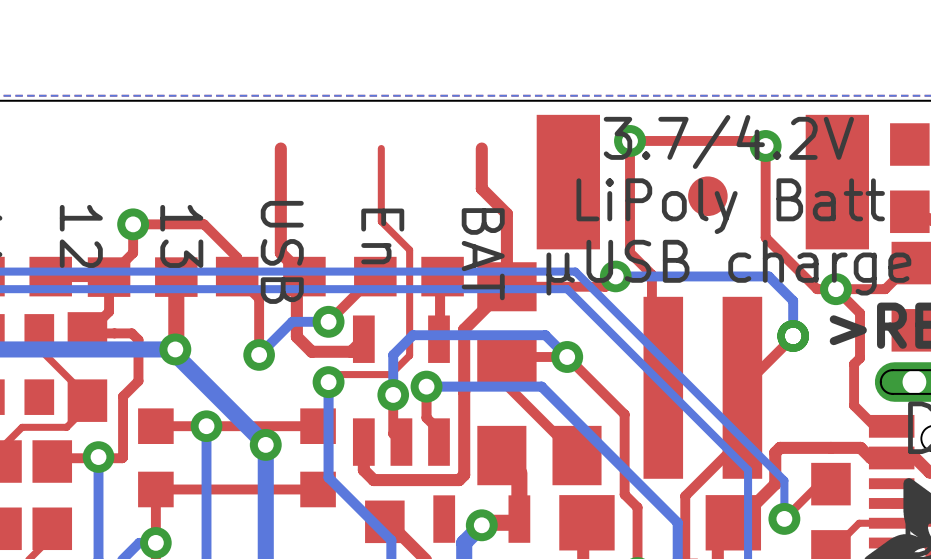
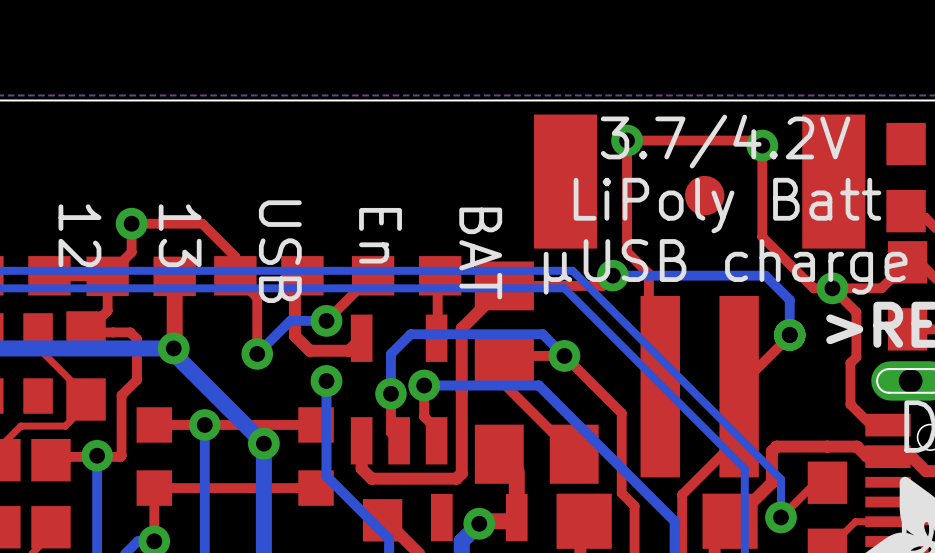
top track: (280, 148) (280, 253) (304, 276) -> none
top track: (381, 148) (381, 221) (409, 249) (409, 355) (390, 374) (336, 374) -> none
top track: (481, 148) (481, 188) (506, 213) (506, 286) -> none

